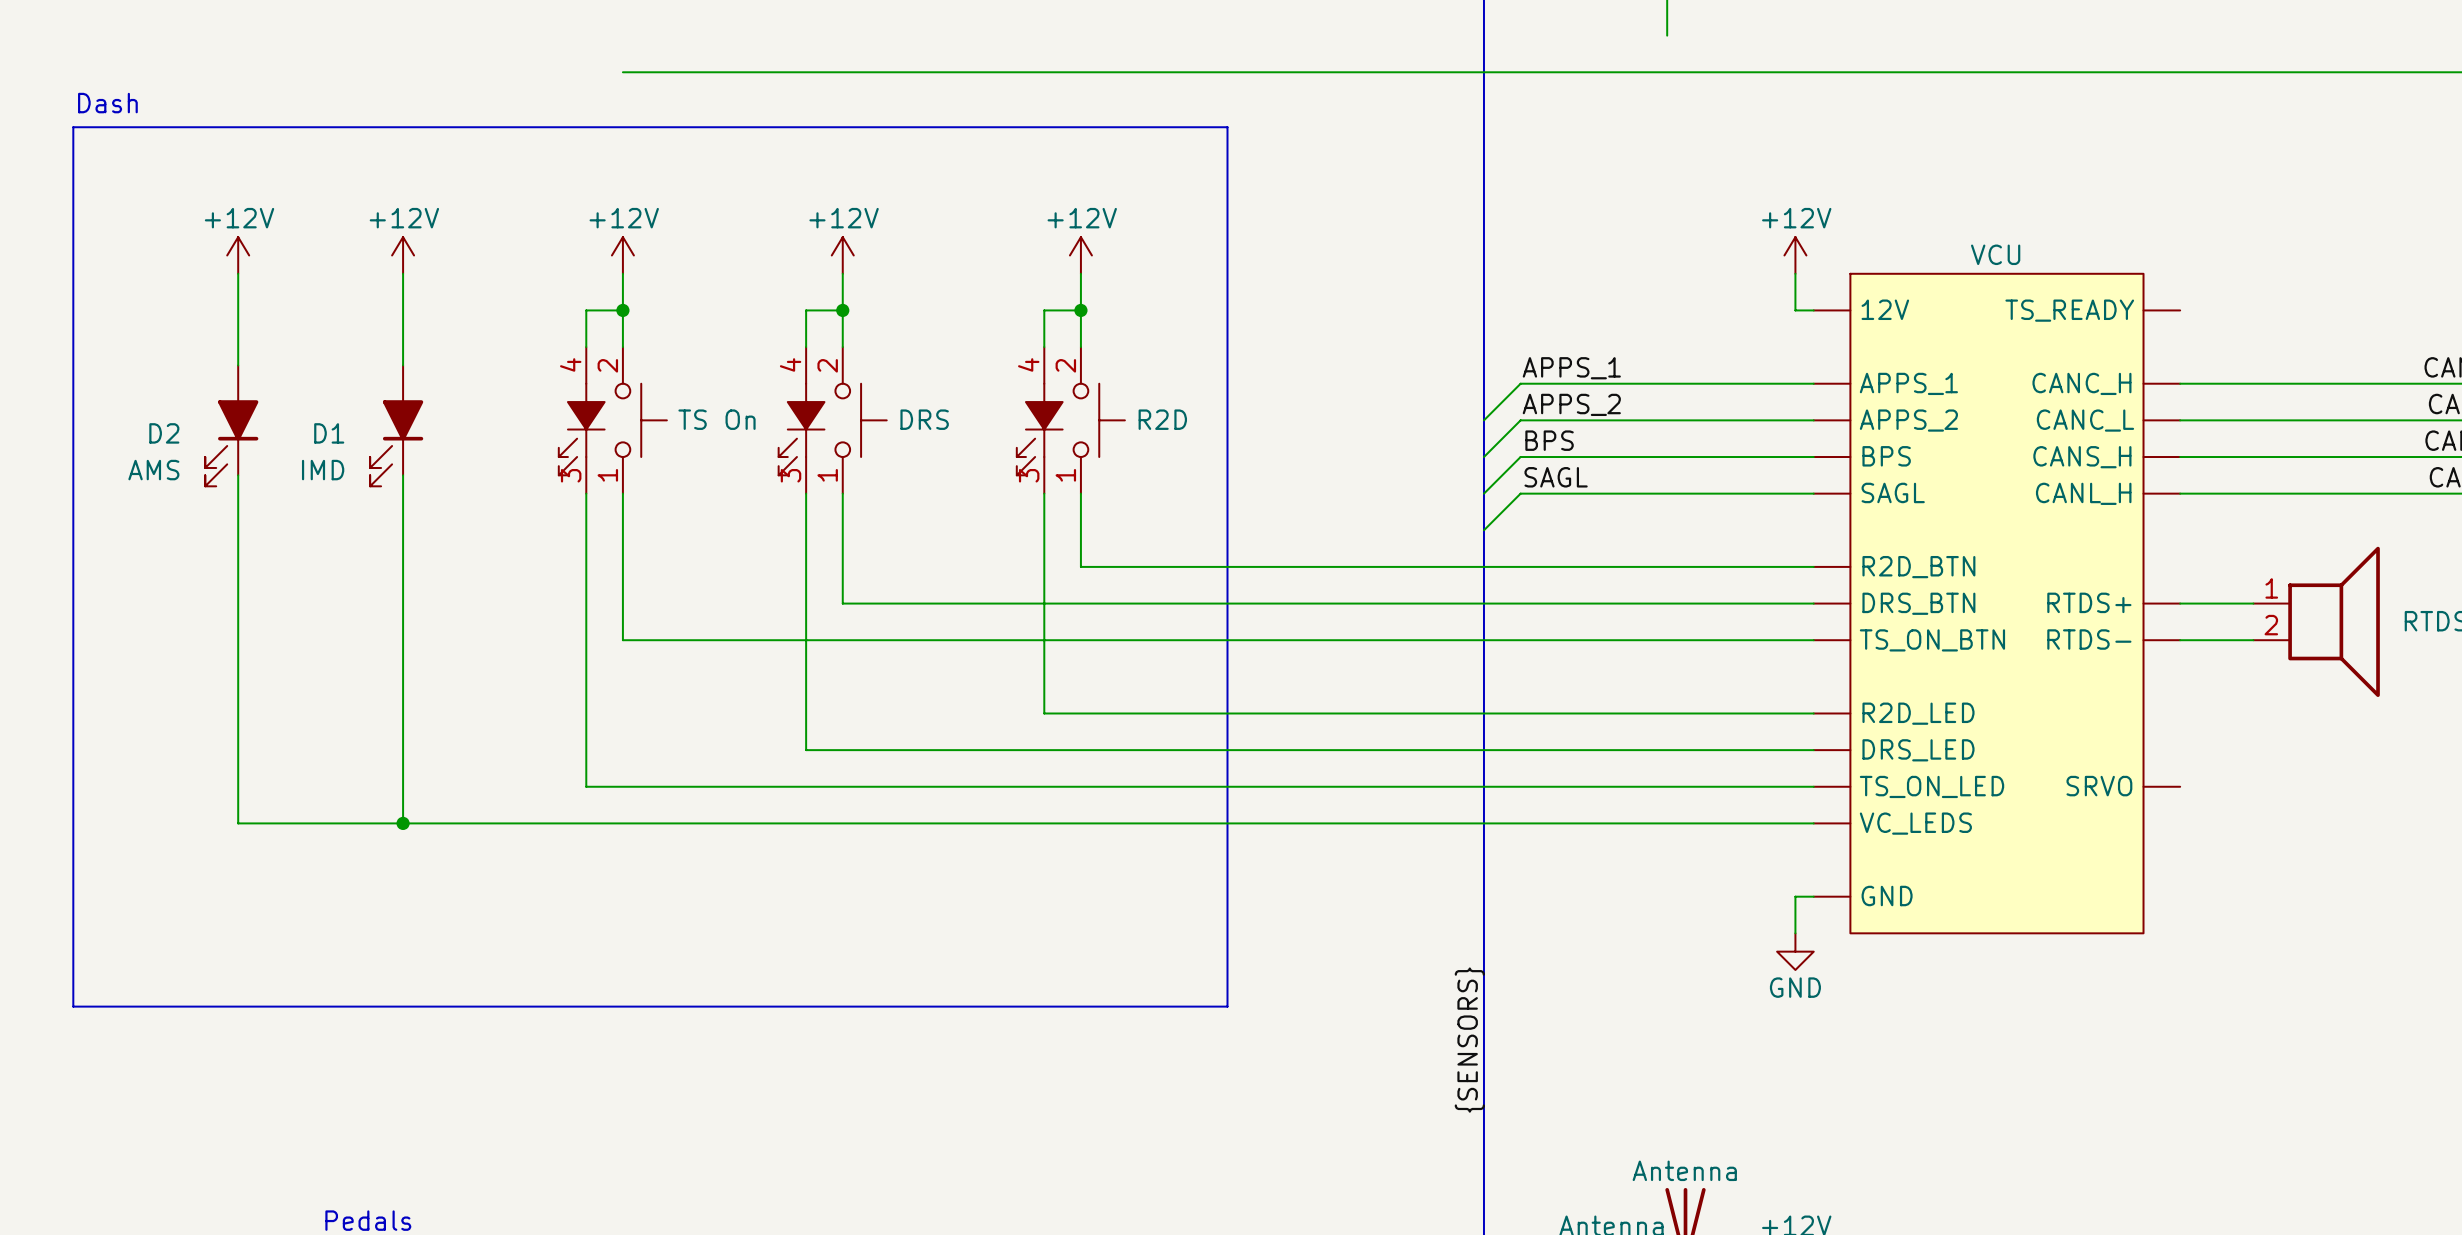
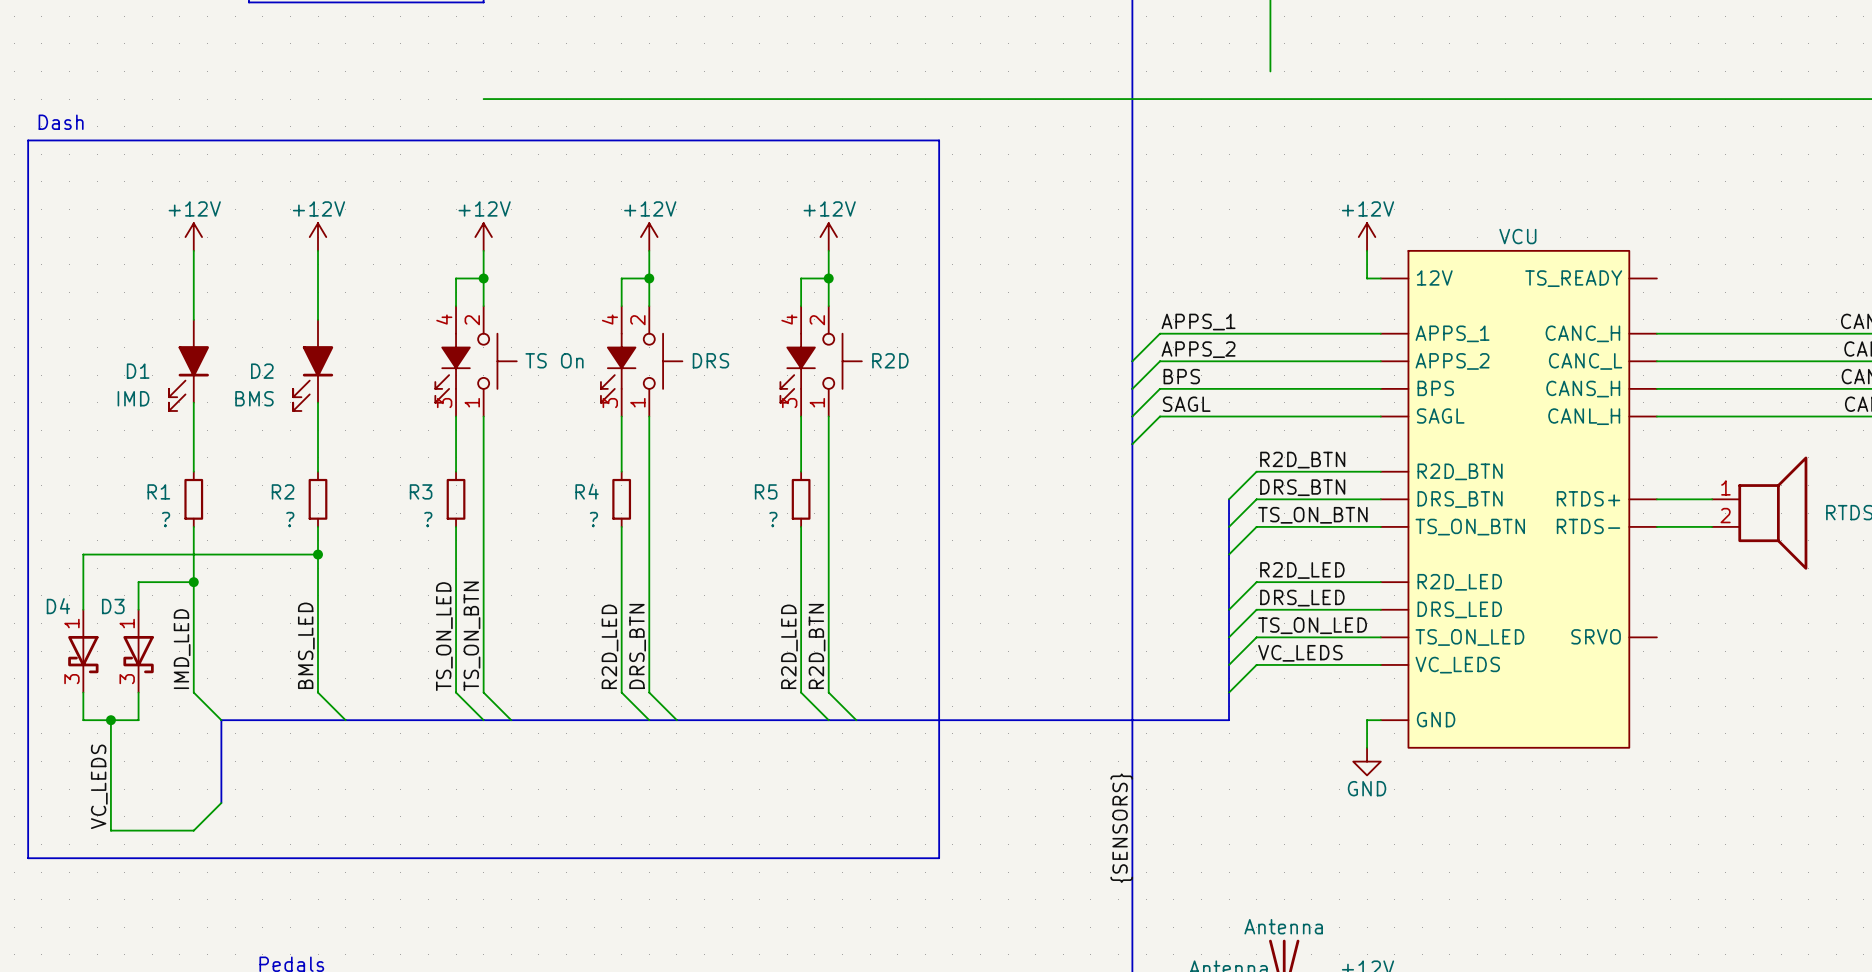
text position: Dash (107, 103) -> Dash (61, 122)
line: (73, 127) (73, 1006) (1227, 1006) -> (69, 140) (28, 140) (28, 858) (939, 858) (939, 803)
D2 name: D2 (164, 433) -> D1 (138, 371)
D1 name: D1 (329, 433) -> D2 (262, 371)
D2 value: AMS (153, 470) -> IMD (133, 398)
D1 value: IMD (323, 470) -> BMS (254, 398)
label: none -> R2D_BTN (1302, 460)
wire: (238, 566) (238, 640) -> none
wire: (403, 566) (403, 640) -> none
wire: (586, 566) (586, 640) -> none
wire: (806, 566) (806, 640) -> none
wire: (1044, 566) (1044, 640) -> none
wire: (1080, 566) (1648, 566) -> (1229, 499) (1256, 471)
wire: none -> (828, 471) (828, 692) (856, 720)
label: none -> DRS_BTN (1302, 487)
R1: none -> ? (193, 499)
R2: none -> ? (318, 499)
R3: none -> ? (456, 499)
R4: none -> ? (621, 499)
wire: (842, 603) (1648, 603) -> (1229, 526) (1256, 499)
wire: none -> (649, 499) (649, 692) (676, 720)
R5: none -> ? (801, 499)
bus: none -> (1229, 499) (1229, 720) (221, 720) (221, 803)
label: none -> TS_ON_BTN (1312, 515)
wire: (622, 640) (1648, 640) -> (1229, 554) (1256, 526)
wire: none -> (483, 526) (483, 692) (511, 720)
wire: none -> (318, 554) (83, 554) (83, 609)
junction: none -> (318, 554)
label: none -> R2D_LED (1302, 570)
wire: none -> (193, 582) (138, 582) (138, 609)
junction: none -> (193, 582)
wire: (1044, 713) (1648, 713) -> (1229, 609) (1256, 582)
wire: none -> (801, 582) (801, 692) (828, 720)
label: none -> DRS_LED (1302, 598)
wire: (806, 750) (1648, 750) -> (1229, 637) (1256, 609)
wire: none -> (621, 609) (621, 692) (649, 720)
label: none -> TS_ON_LED (1312, 625)
label: none -> TS_ON_LED (444, 636)
label: none -> TS_ON_BTN (471, 636)
wire: (586, 786) (1648, 786) -> (1229, 664) (1256, 637)
wire: none -> (456, 637) (456, 692) (483, 720)
label: none -> BMS_LED (306, 645)
label: none -> DRS_BTN (637, 646)
label: none -> R2D_BTN (817, 646)
label: none -> R2D_LED (610, 646)
label: none -> R2D_LED (789, 646)
label: none -> IMD_LED (182, 649)
D4: none -> (83, 651)
D3: none -> (138, 651)
label: none -> VC_LEDS (1300, 653)
wire: (238, 823) (1648, 823) -> (1229, 692) (1256, 664)
wire: none -> (193, 664) (193, 692) (221, 720)
wire: none -> (318, 664) (318, 692) (345, 720)
junction: (403, 823) -> none
wire: none -> (83, 692) (83, 720) (138, 720) (138, 692)
wire: none -> (110, 720) (110, 830) (193, 830) (221, 803)
junction: none -> (110, 720)
label: none -> VC_LEDS (99, 786)

